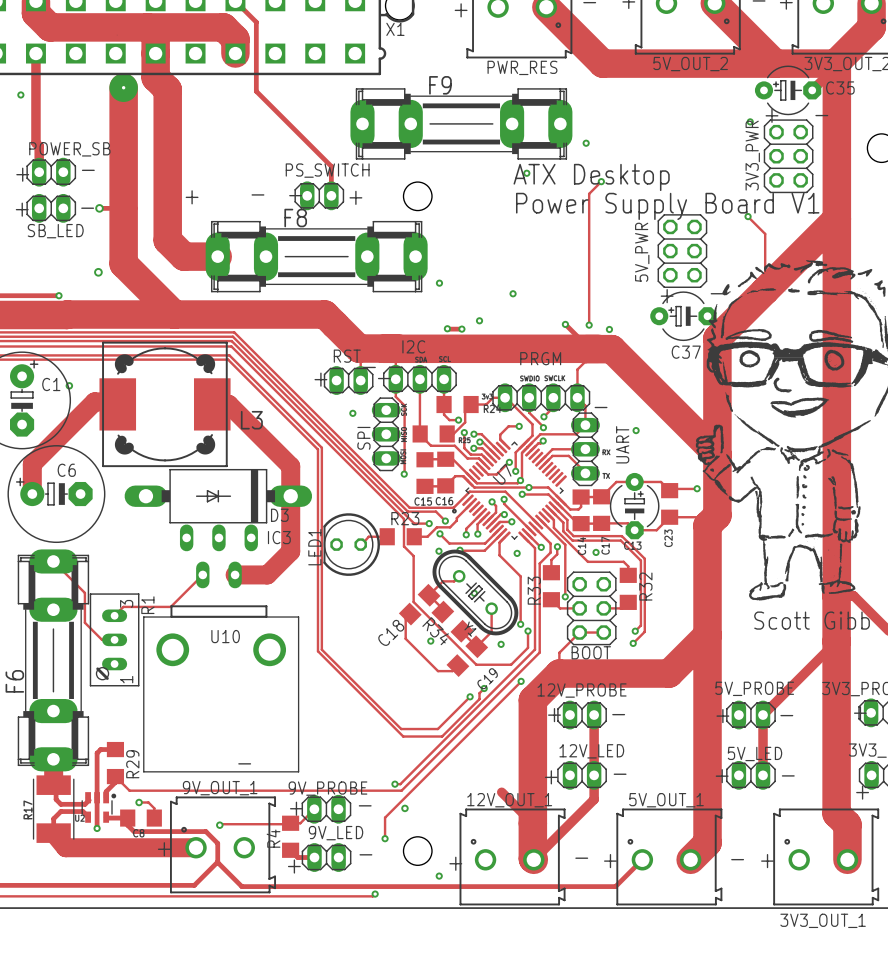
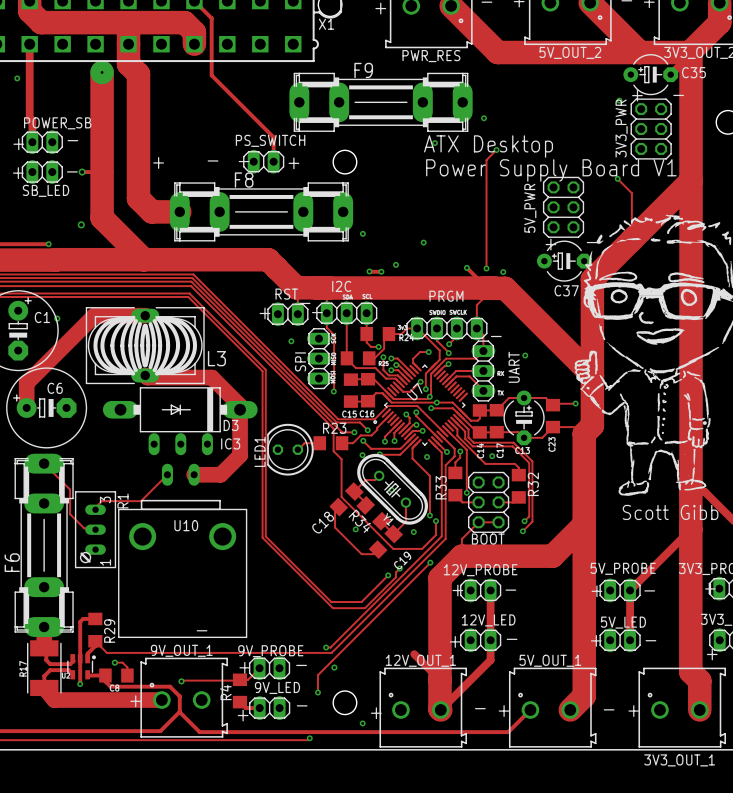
L3 footprint: [99, 341, 231, 468] -> [85, 307, 205, 385]
track: (117, 404) (115, 401) (94, 401) (32, 464) -> (145, 315) (94, 315) (26, 383)
track: (212, 404) (228, 404) (290, 466) (290, 491) -> (145, 375) (147, 377) (211, 377) (240, 405)
R1 footprint: [89, 593, 140, 687] -> [75, 491, 117, 569]

